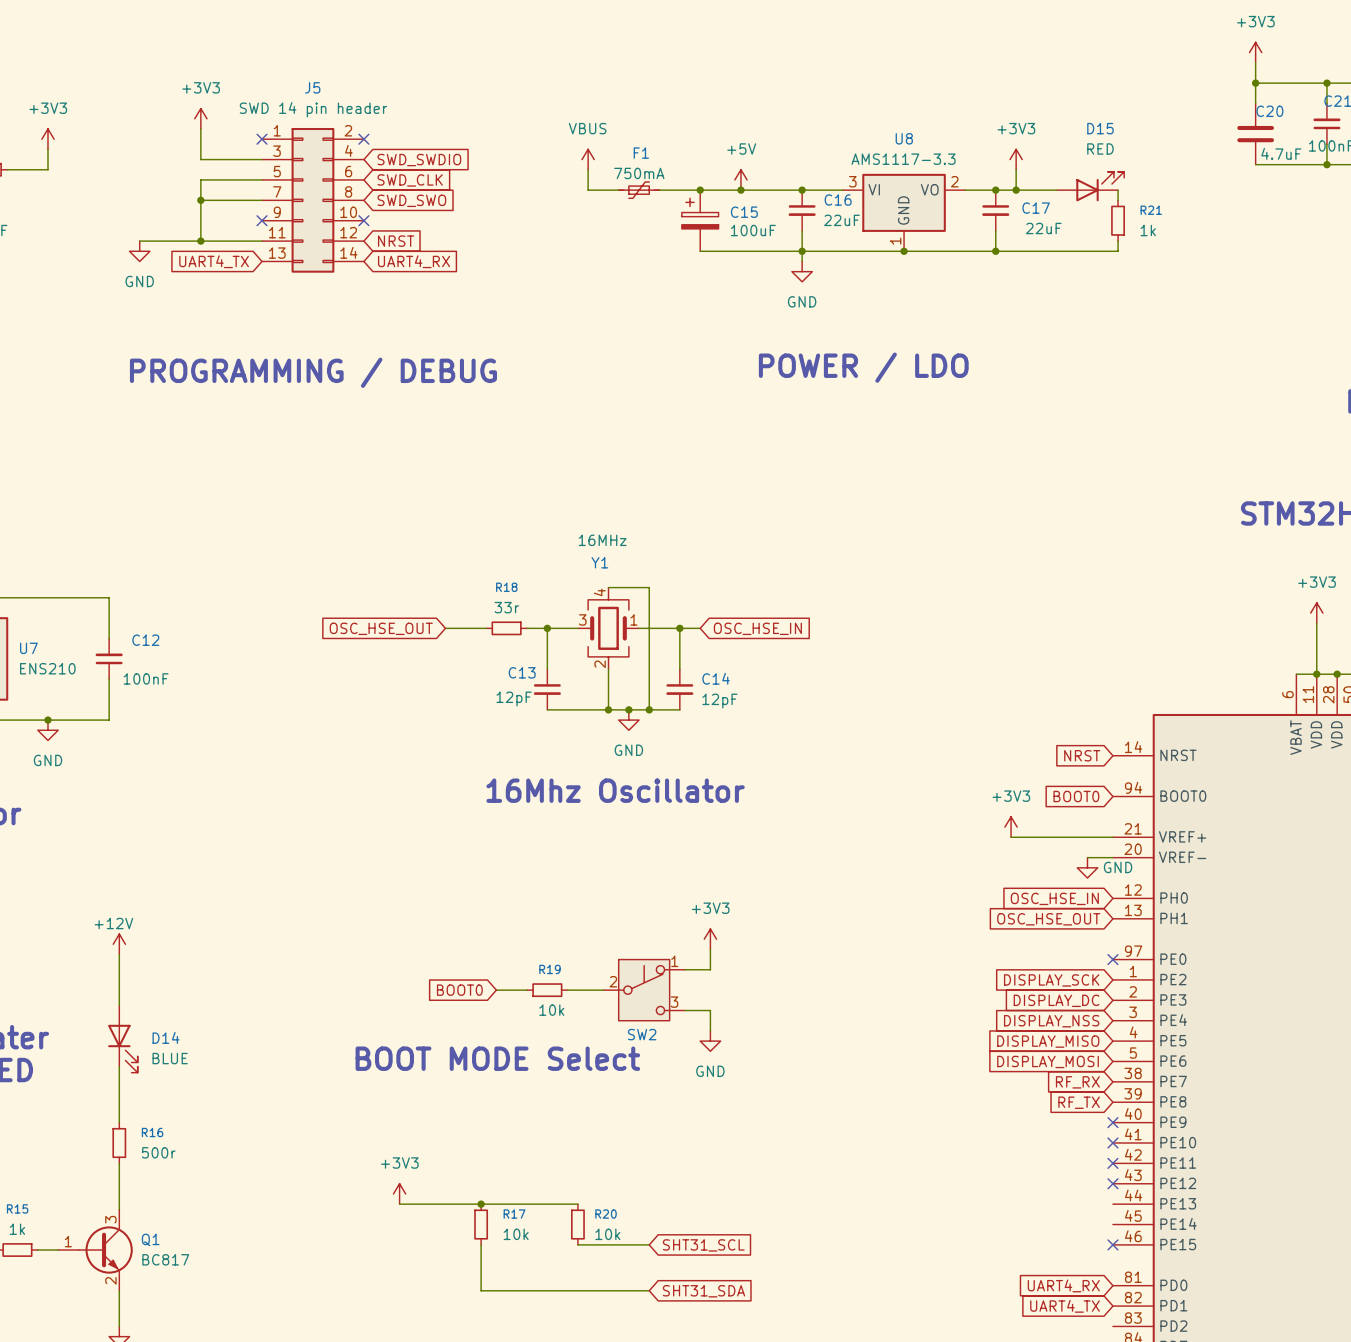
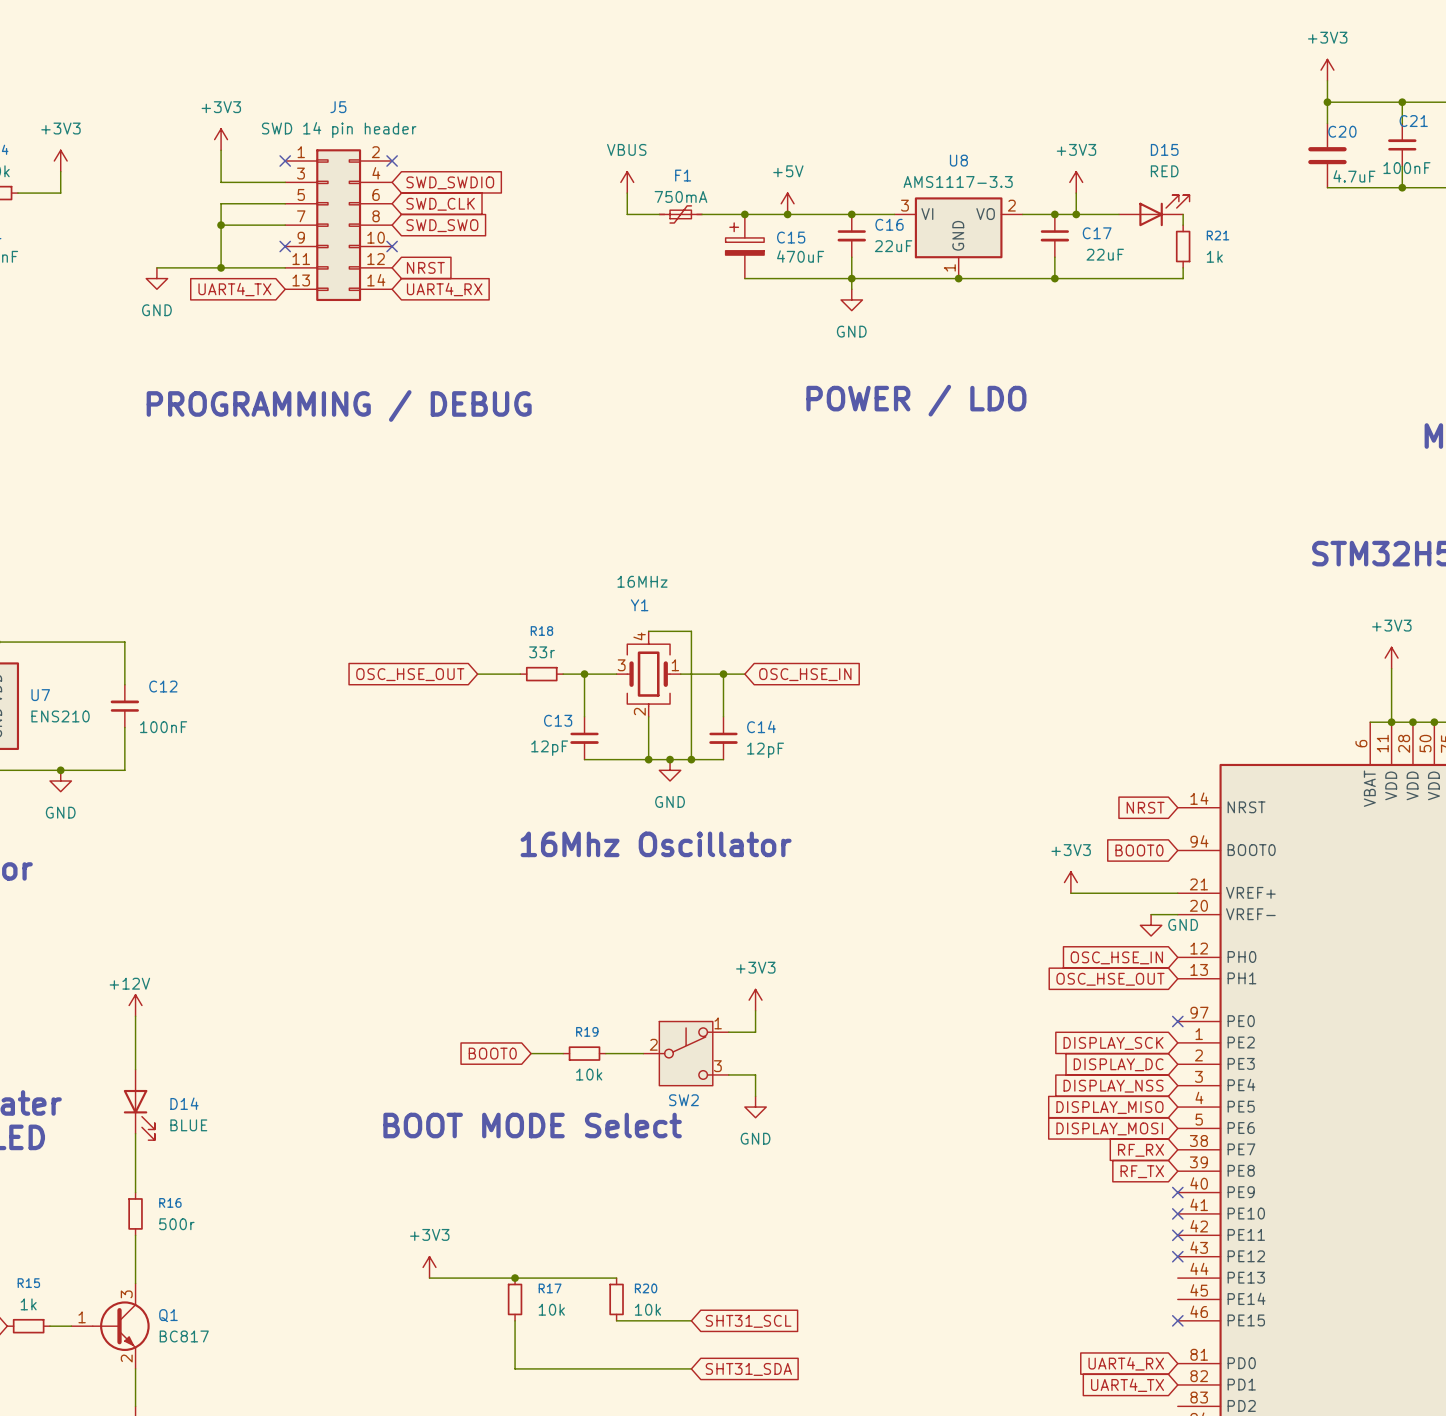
C15 value: 100uF (753, 230) -> 470uF (800, 256)

